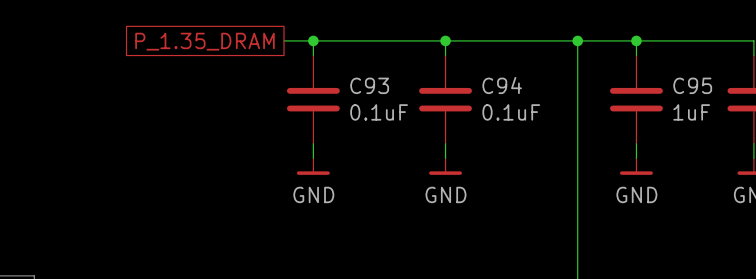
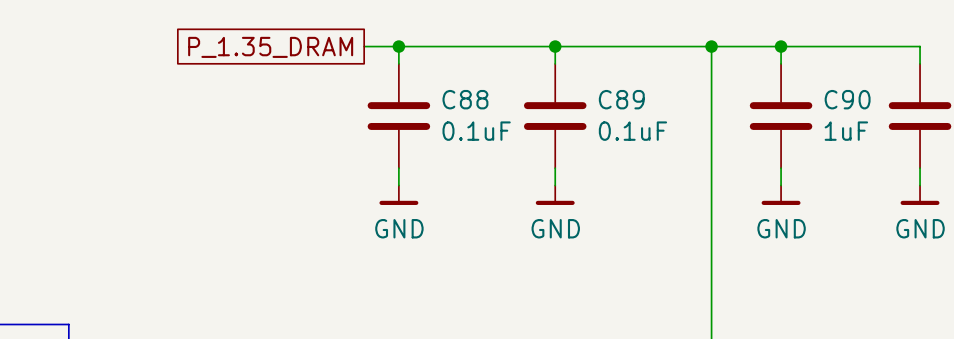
C93 name: C93 (369, 85) -> C88 (465, 99)
C94 name: C94 (502, 85) -> C89 (621, 99)
C95 name: C95 (692, 85) -> C90 (847, 99)

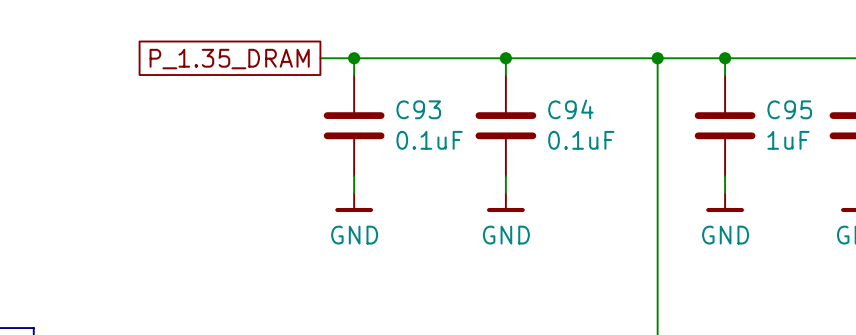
C88 name: C88 (465, 99) -> C93 (418, 109)
C89 name: C89 (621, 99) -> C94 (570, 109)
C90 name: C90 (847, 99) -> C95 (789, 109)

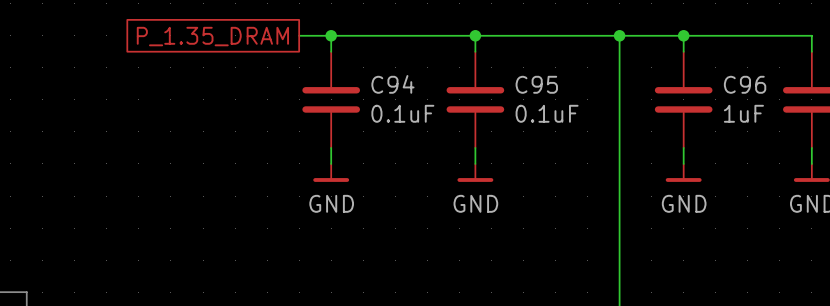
C93 name: C93 (418, 109) -> C94 (392, 84)
C94 name: C94 (570, 109) -> C95 (536, 84)
C95 name: C95 (789, 109) -> C96 (745, 84)

